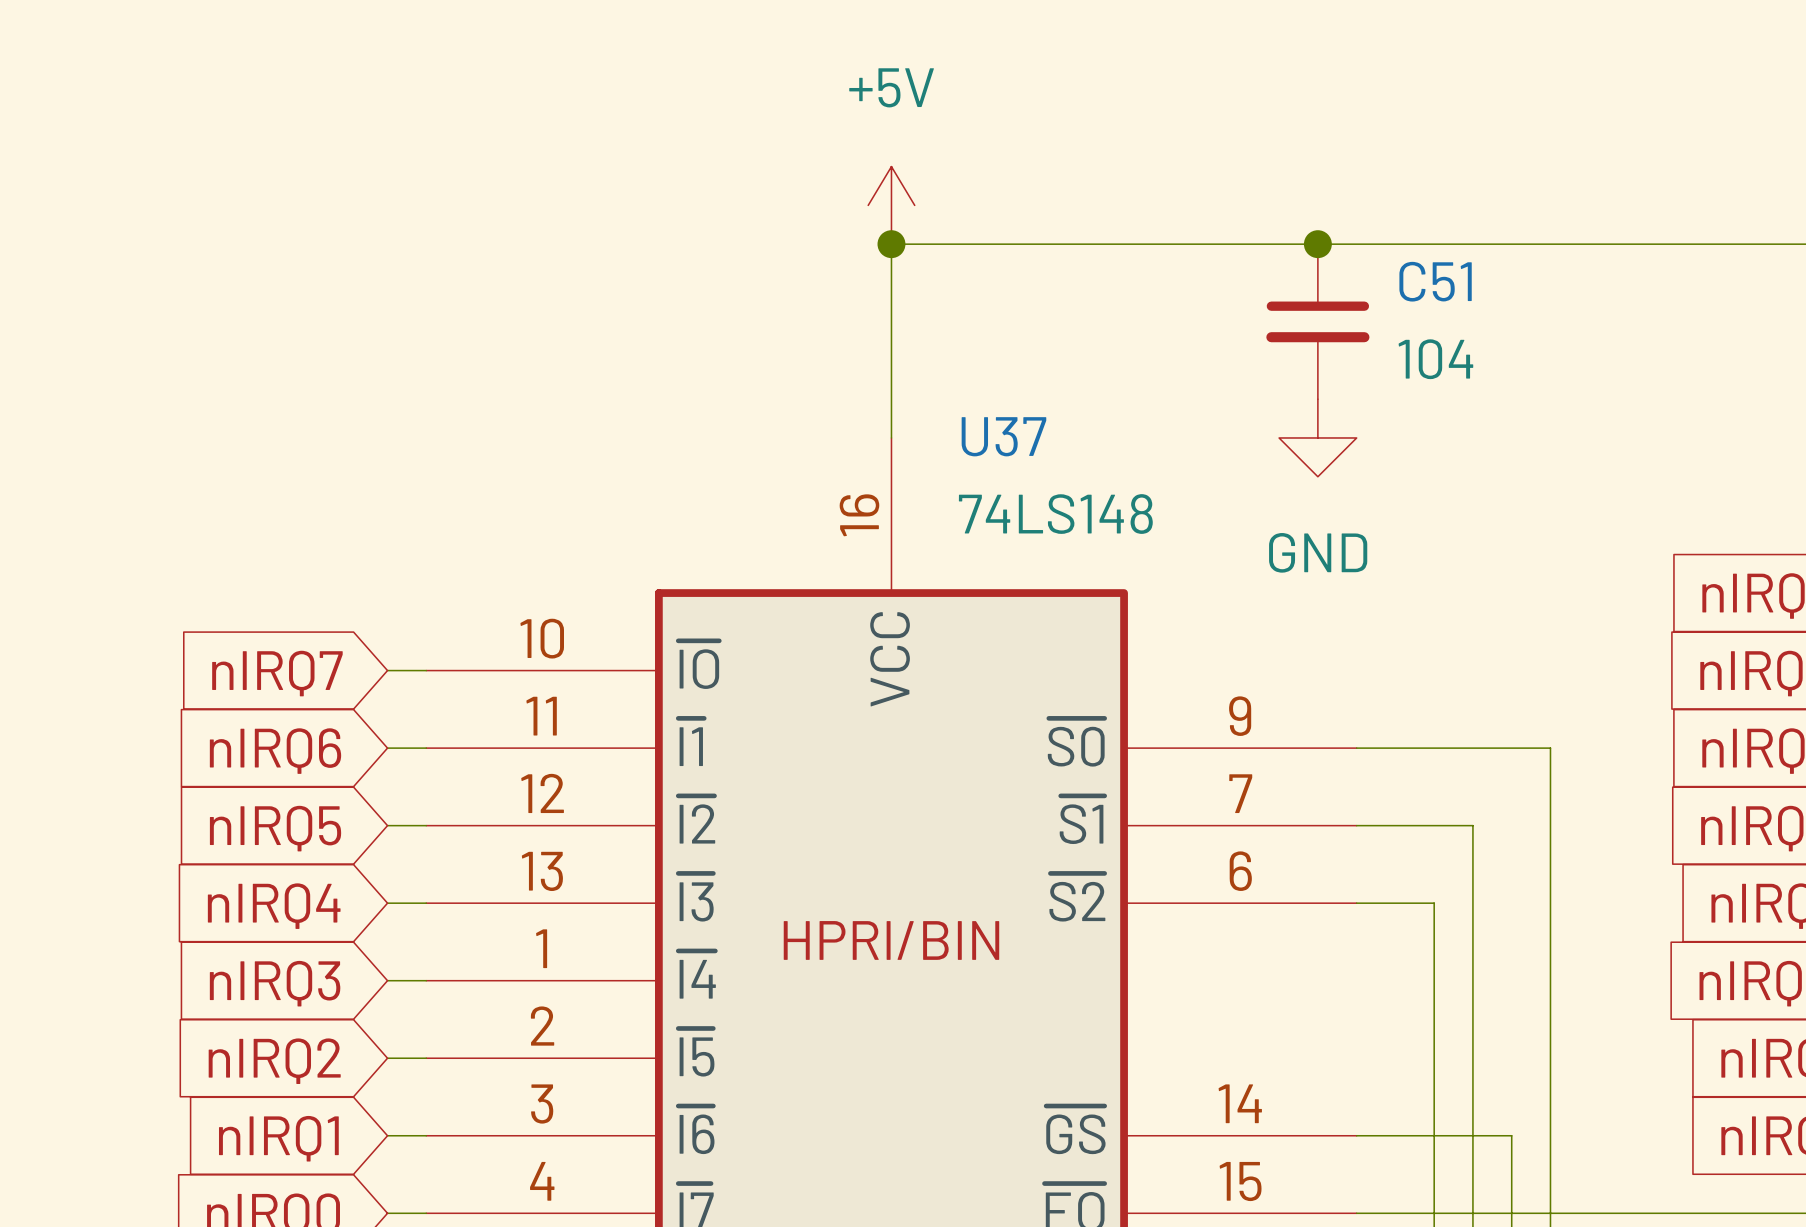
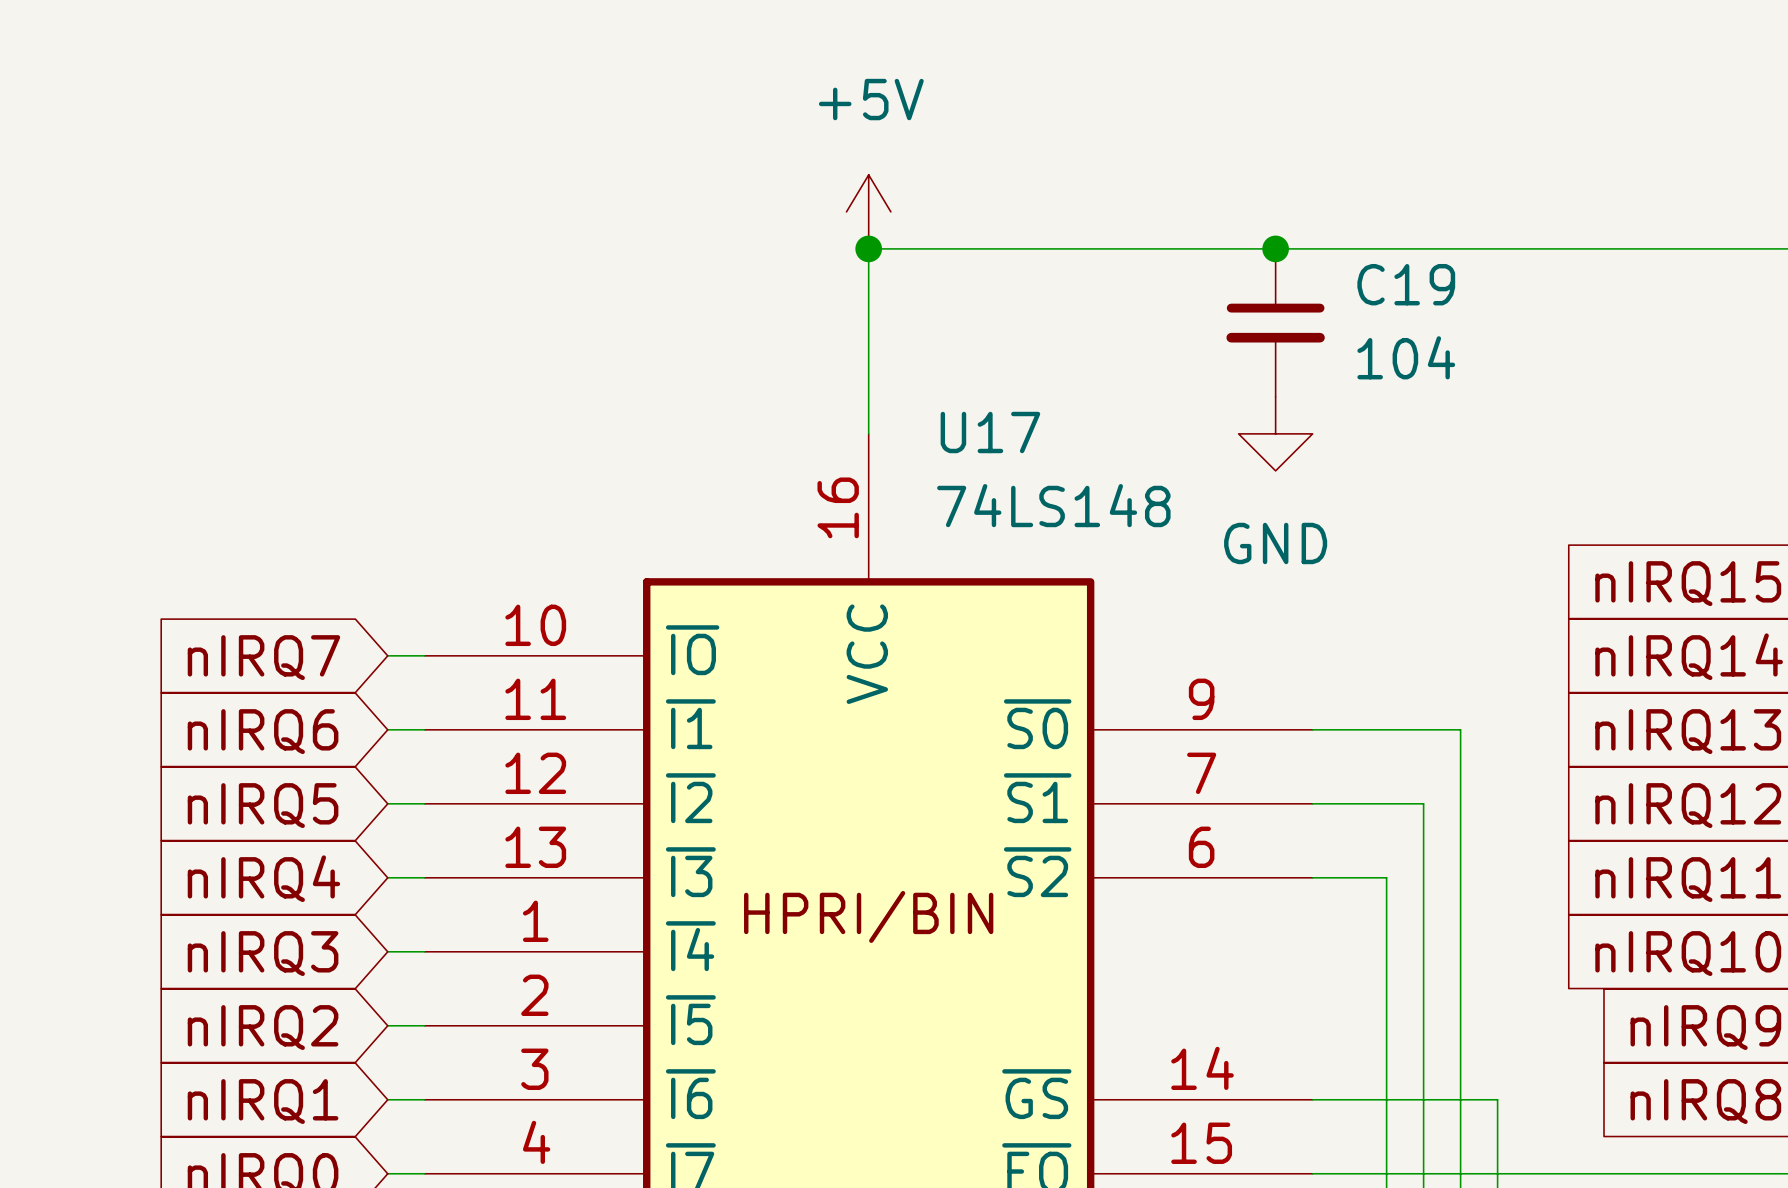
C51 name: C51 (1435, 281) -> C19 (1406, 284)
U37 name: U37 (1003, 436) -> U17 (990, 432)
wire: (1511, 748) (1550, 748) (1550, 1135) -> (1460, 729) (1460, 1099) (1497, 1099)

